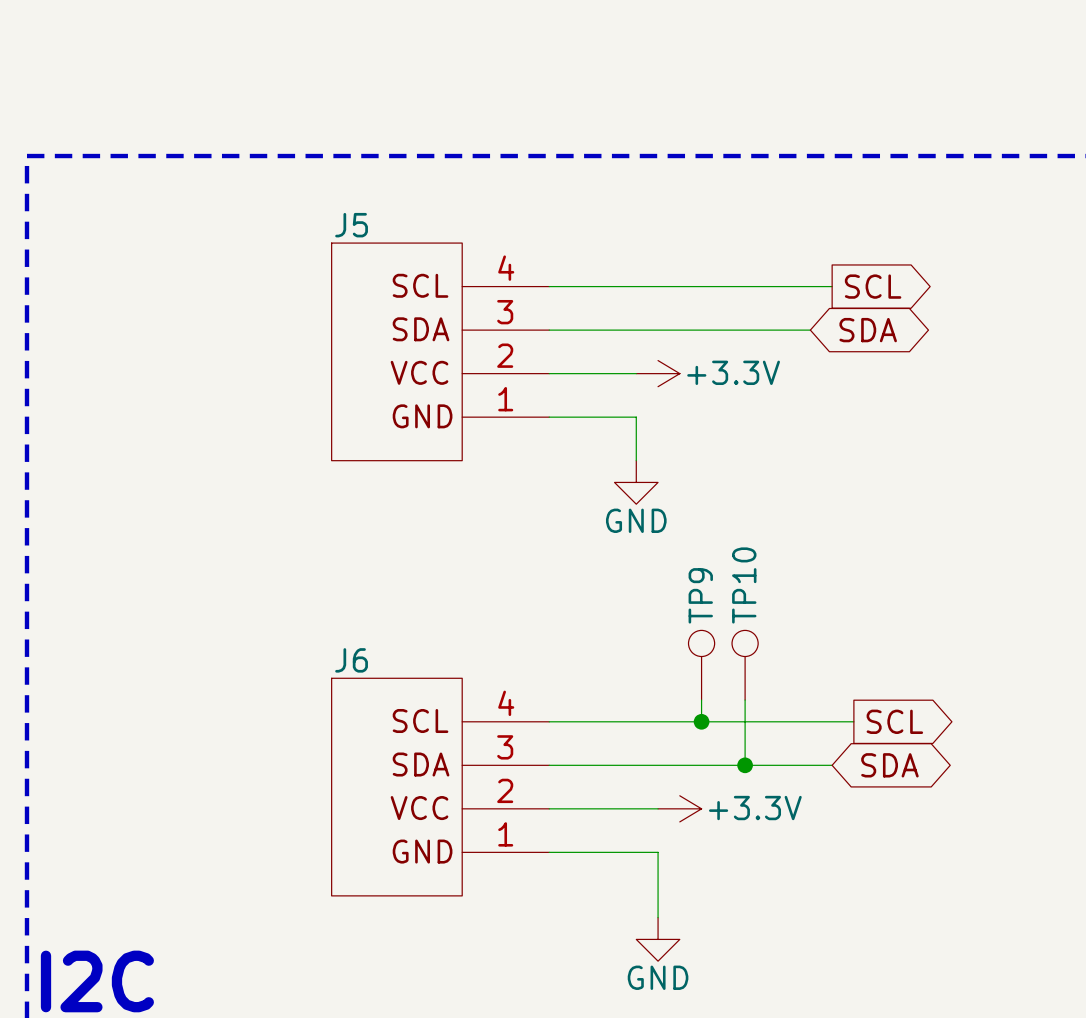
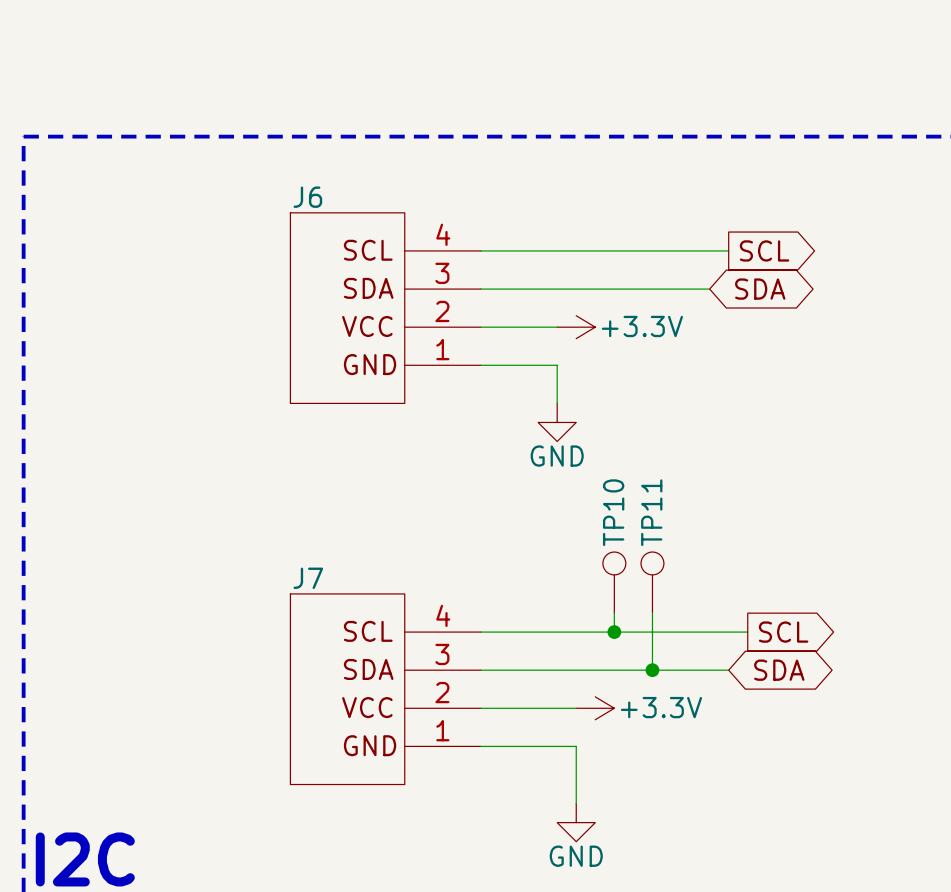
J5 name: J5 (351, 225) -> J6 (307, 197)
TP10 name: TP10 (744, 585) -> TP11 (651, 512)
TP9 name: TP9 (700, 595) -> TP10 (613, 512)
J6 name: J6 (351, 660) -> J7 (308, 578)

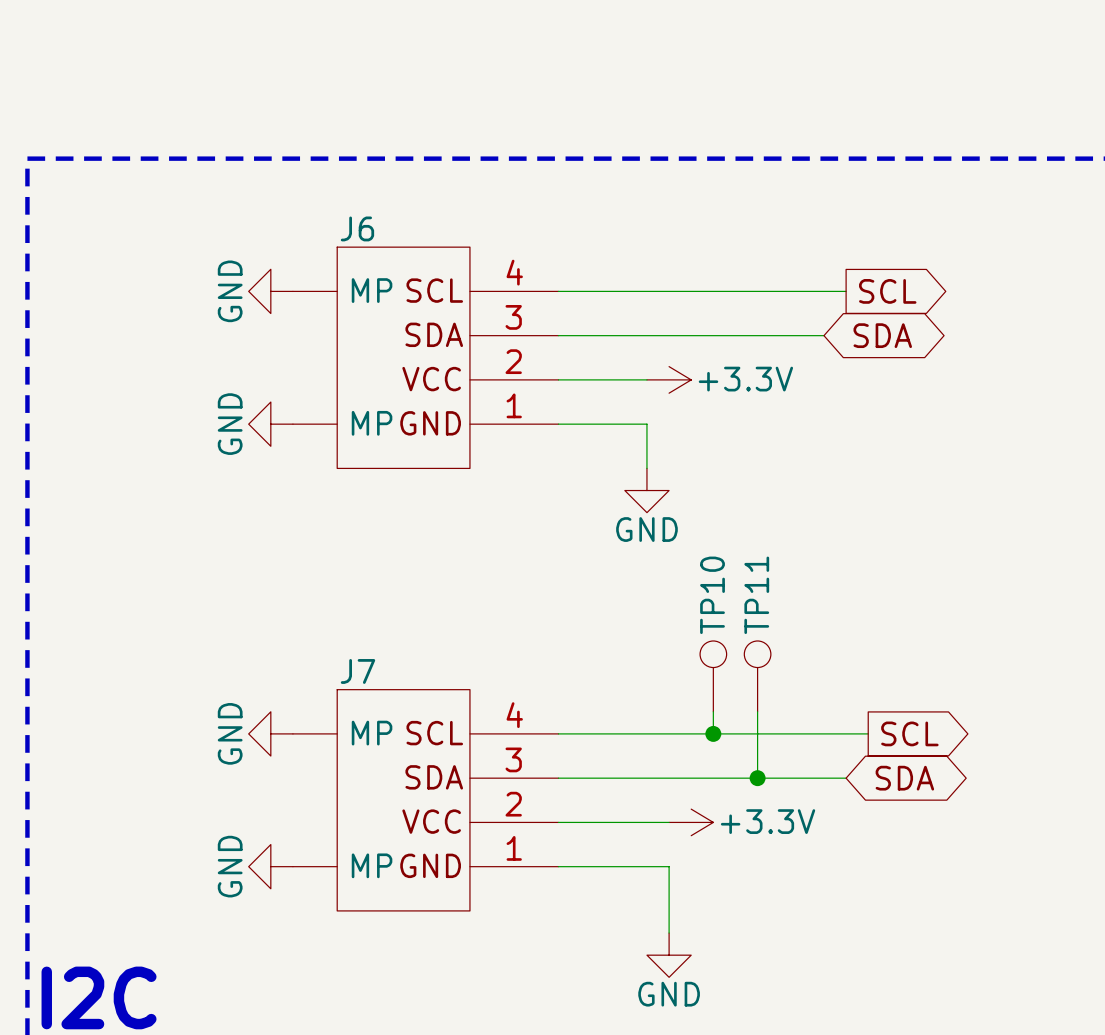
J6 symbol: [290, 212, 481, 404] -> [292, 247, 559, 469]
power symbol: none -> GND (270, 291)
power symbol: none -> GND (270, 424)
J7 symbol: [290, 593, 481, 785] -> [292, 689, 559, 911]
power symbol: none -> GND (270, 733)
power symbol: none -> GND (270, 866)

